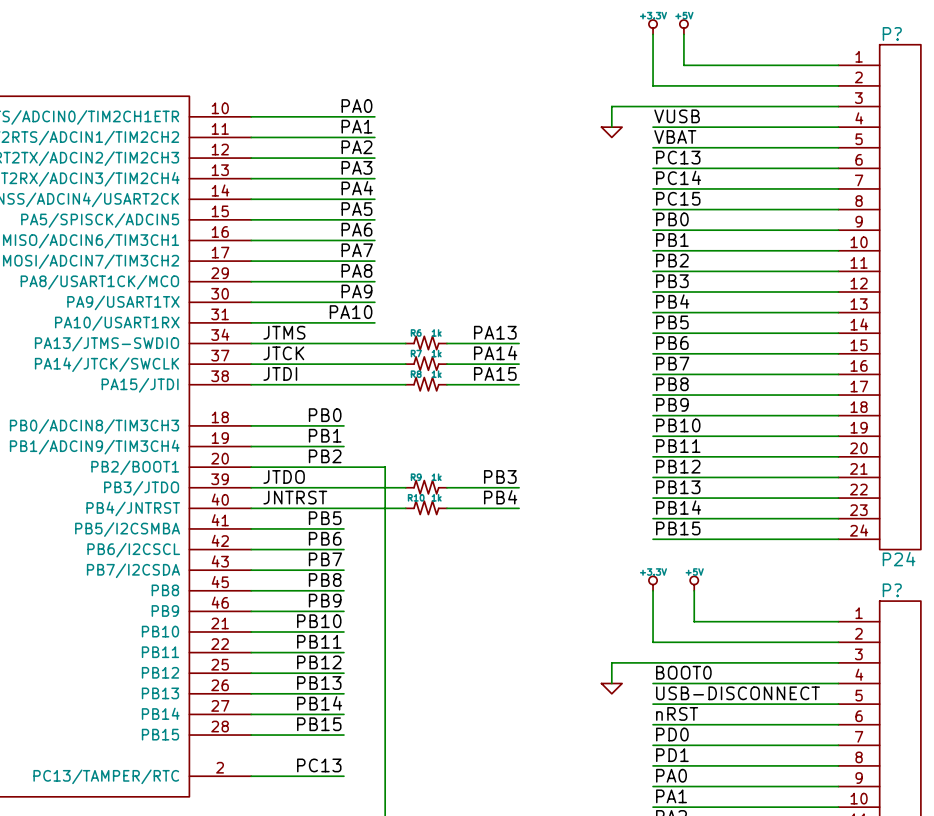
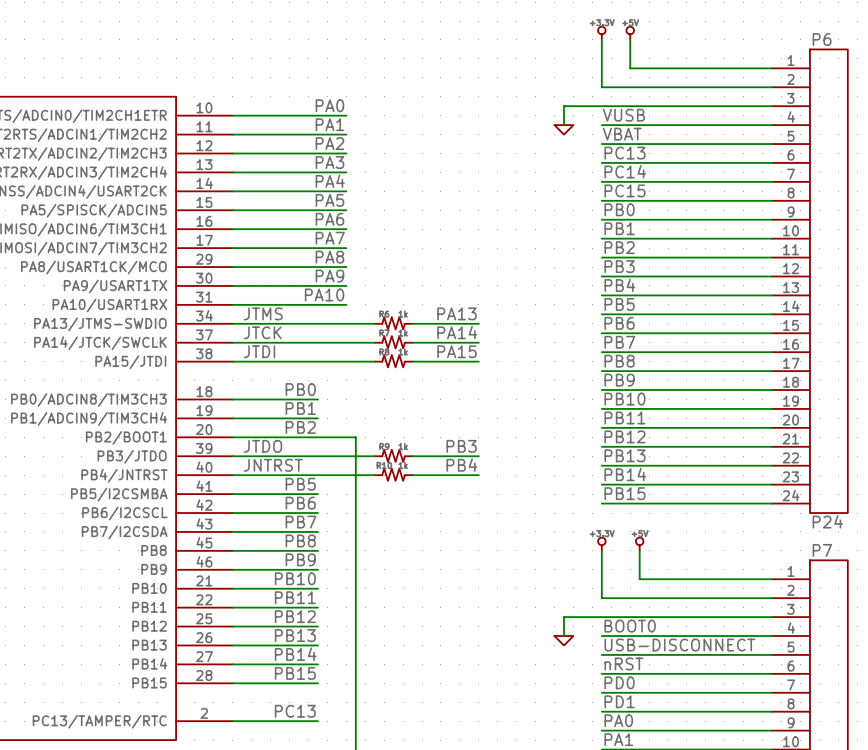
P? name: P? (892, 33) -> P6 (822, 39)
P? name: P? (892, 590) -> P7 (822, 550)

